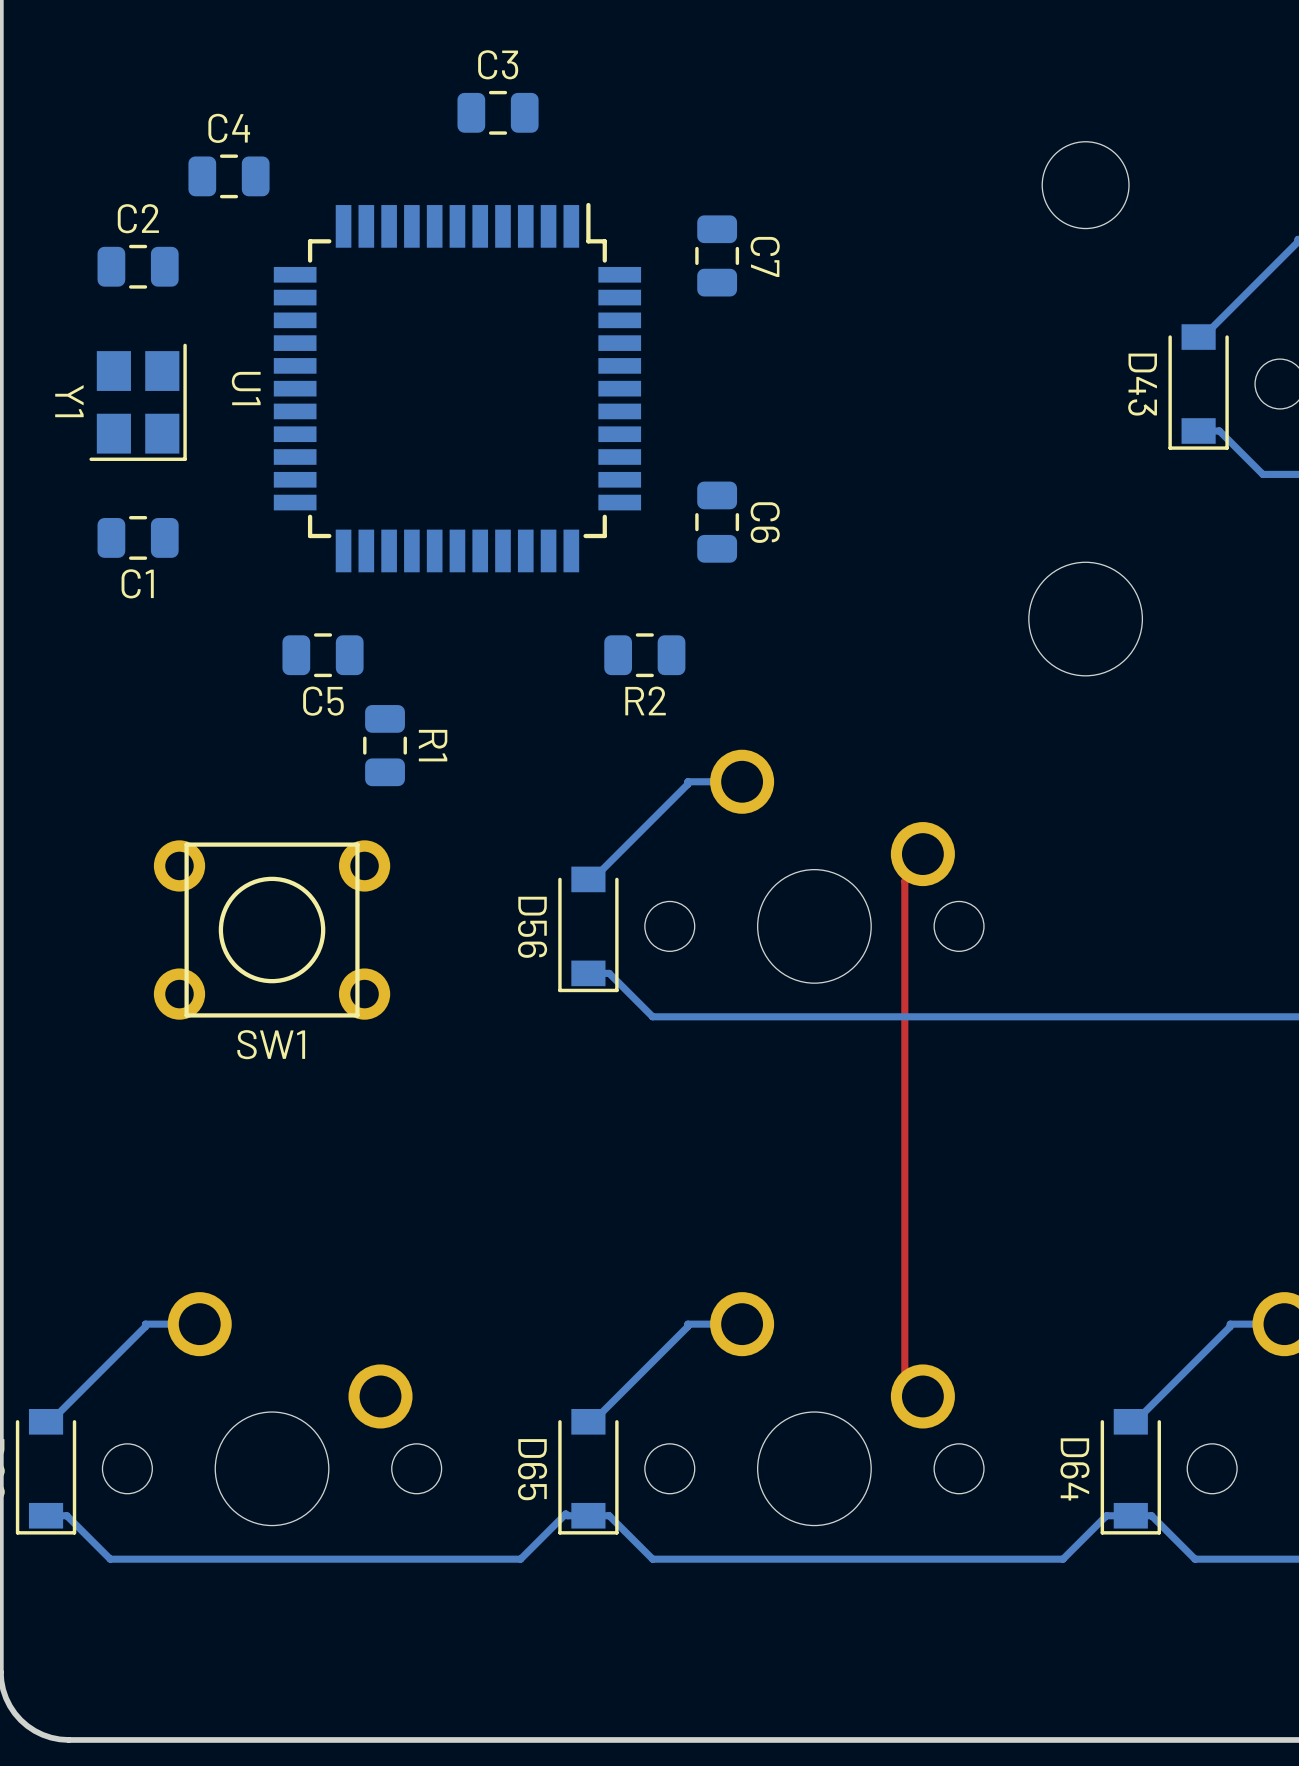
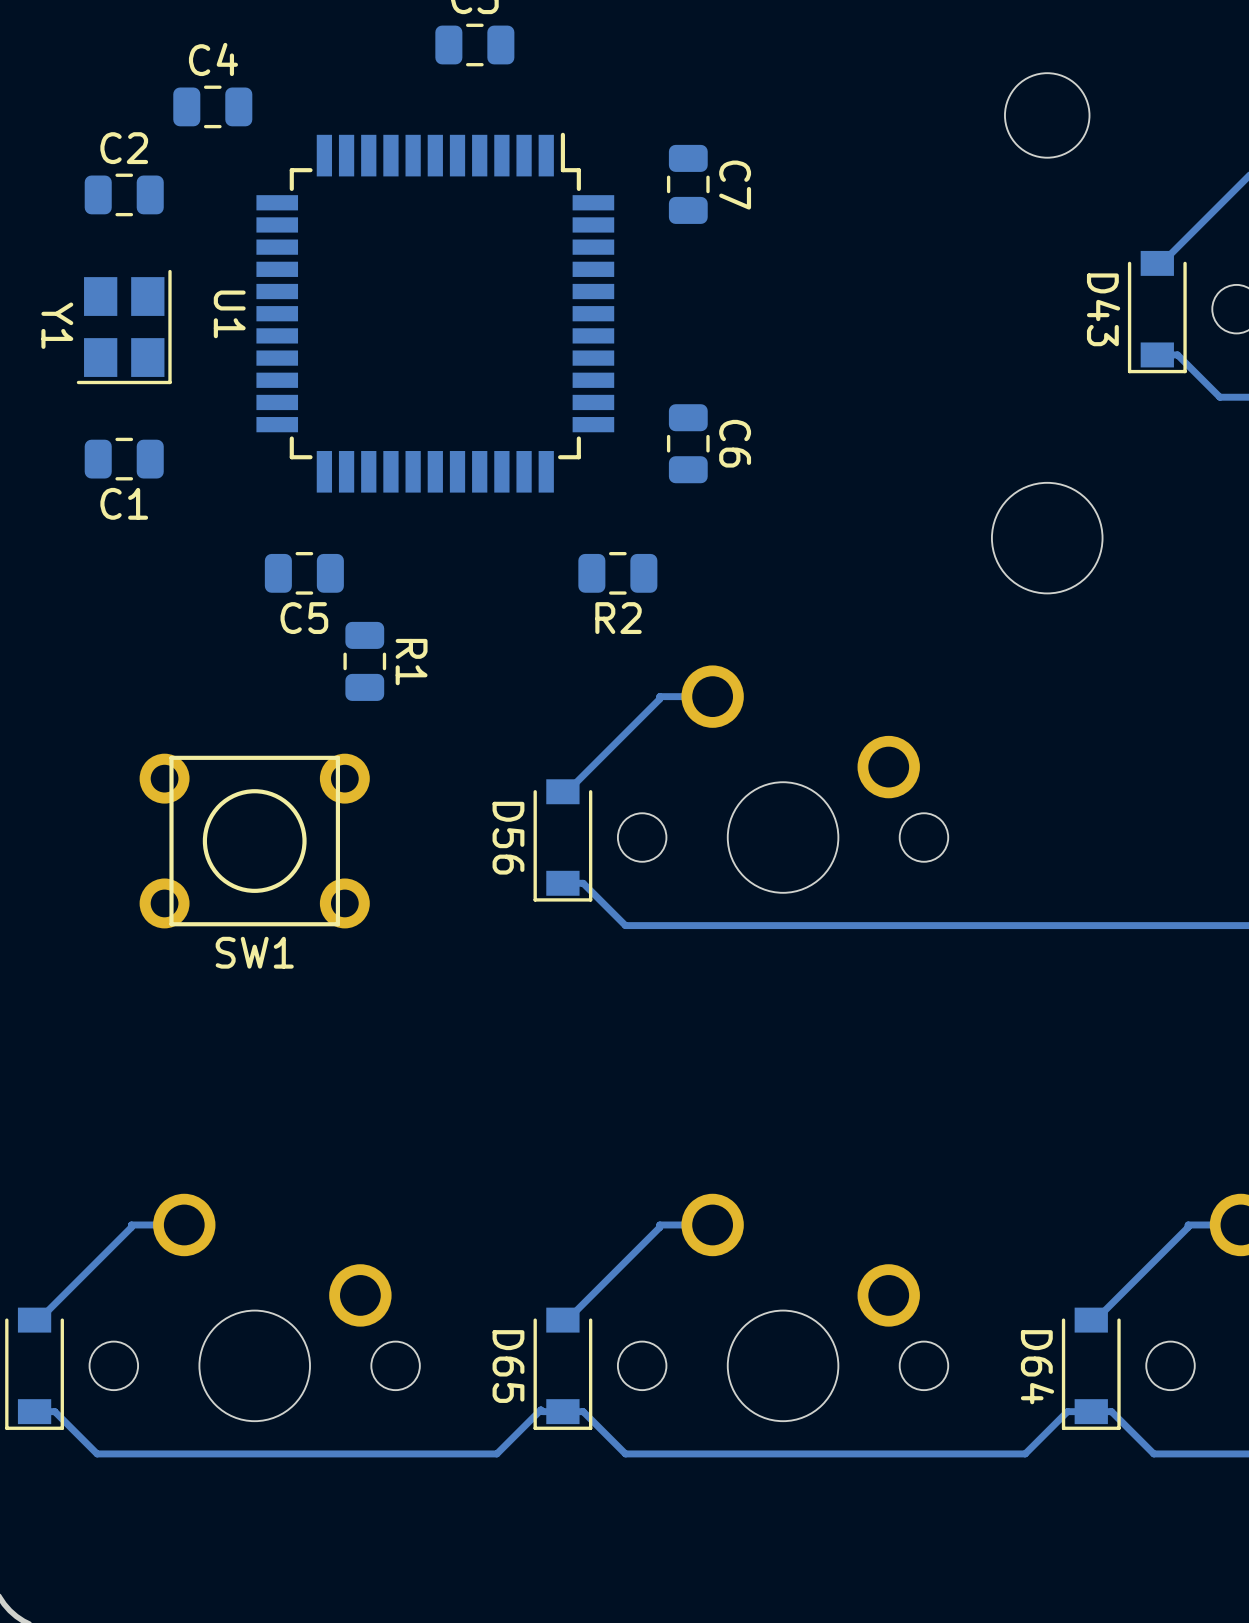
top track: (922, 854) (922, 863) (904, 881) (904, 1378) (922, 1396) -> none

